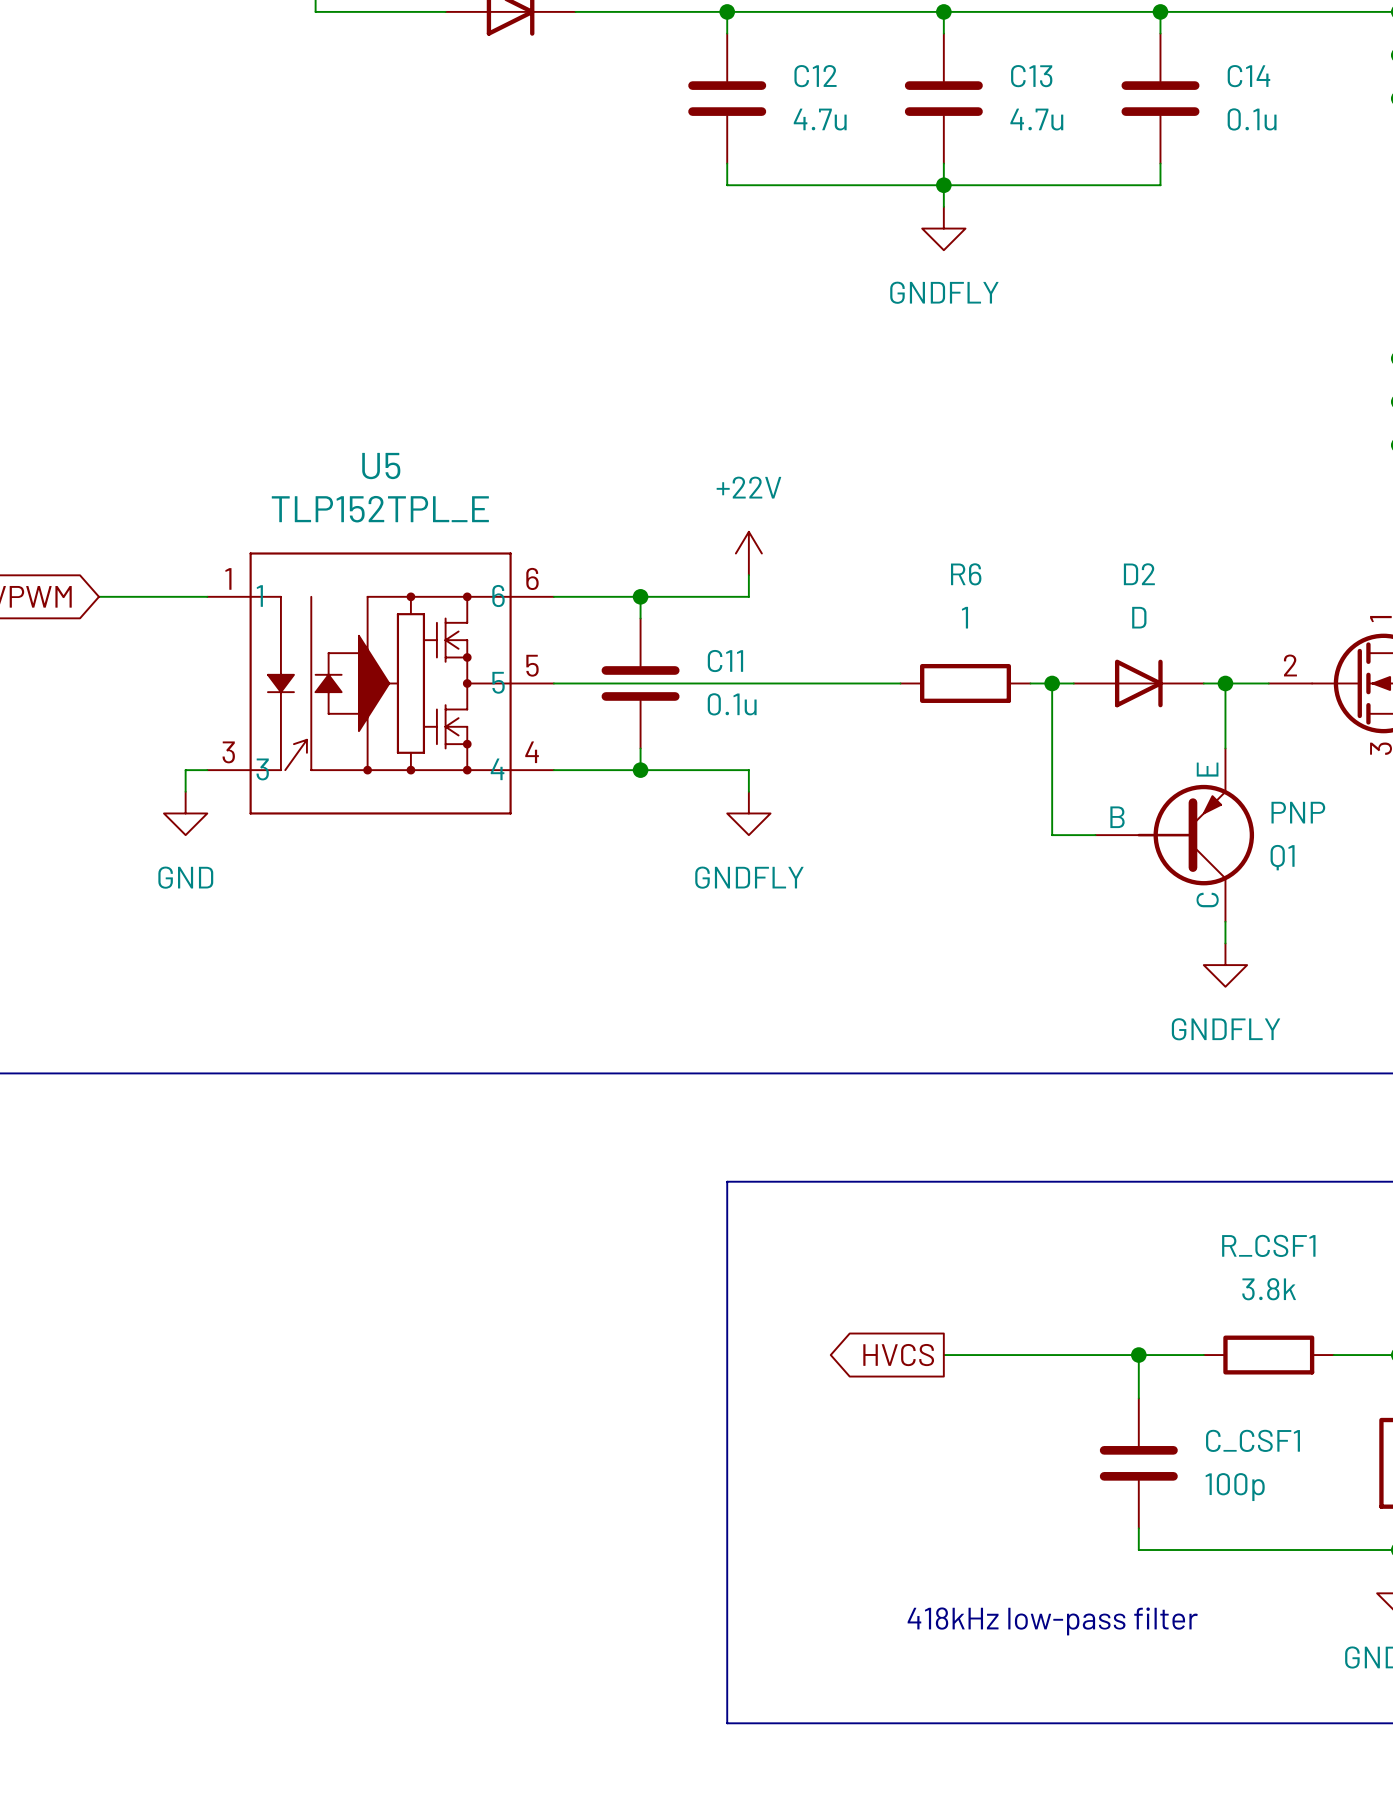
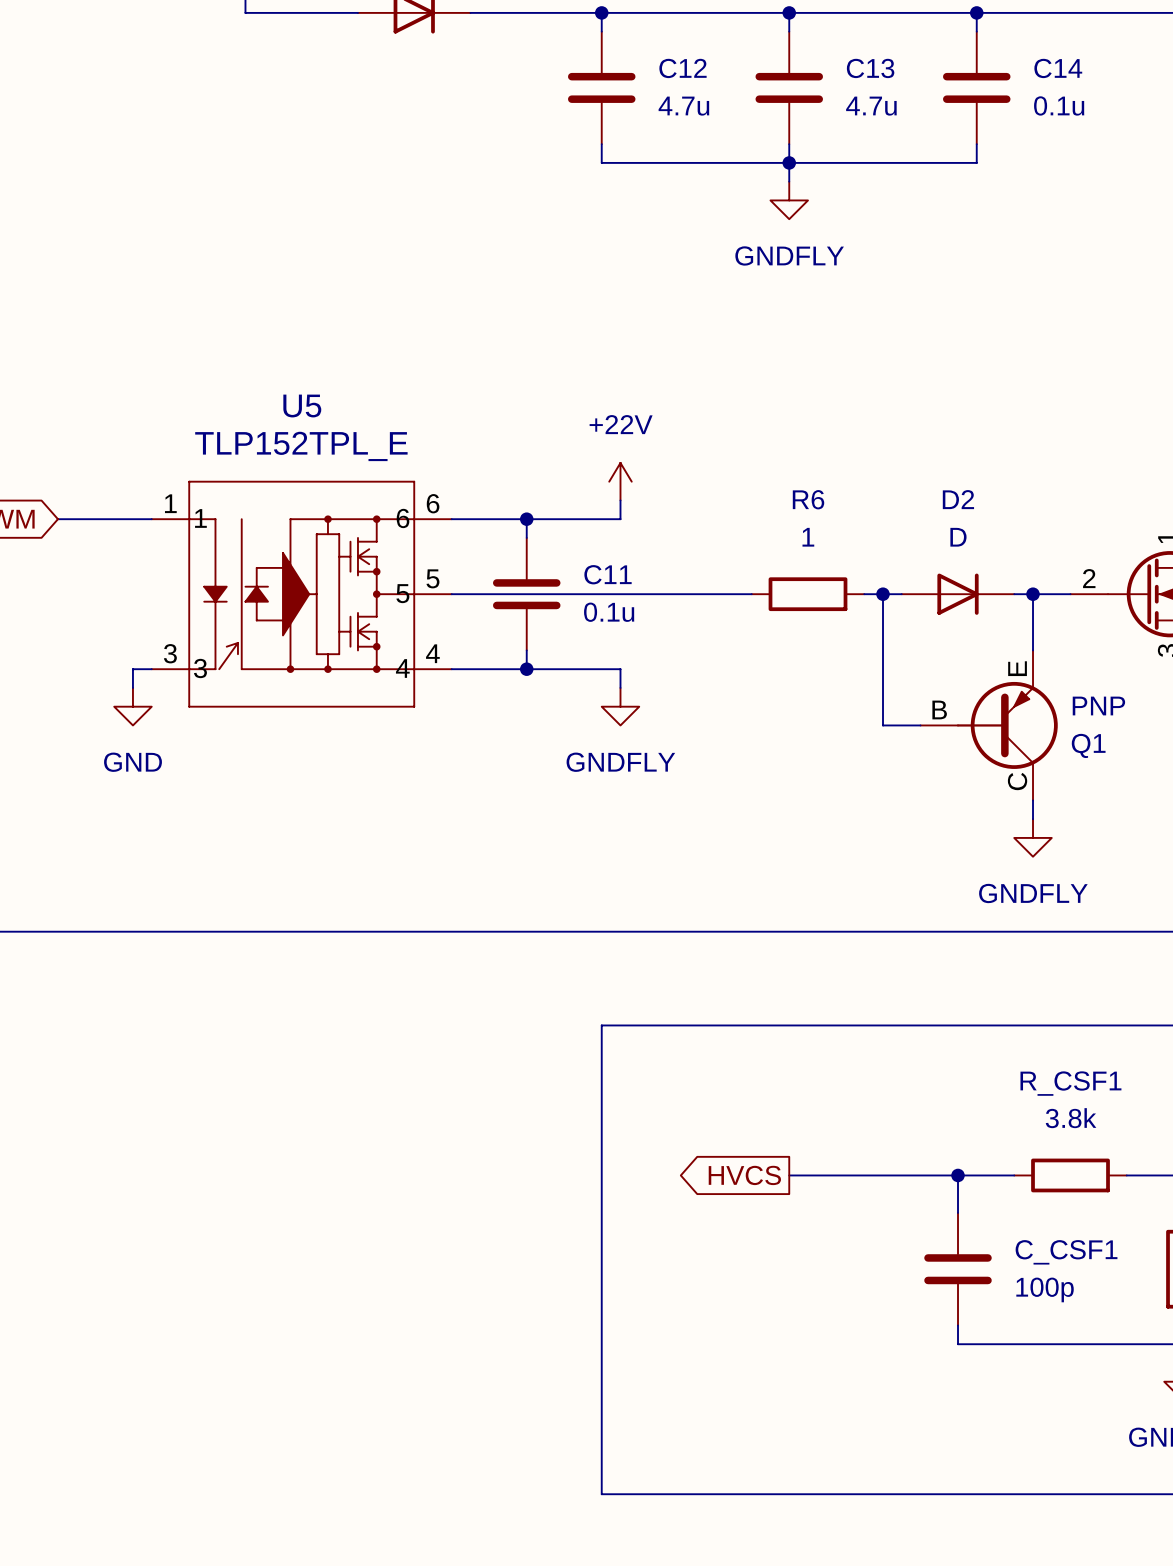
text: 418kHz low-pass filter (1052, 1621) -> none

